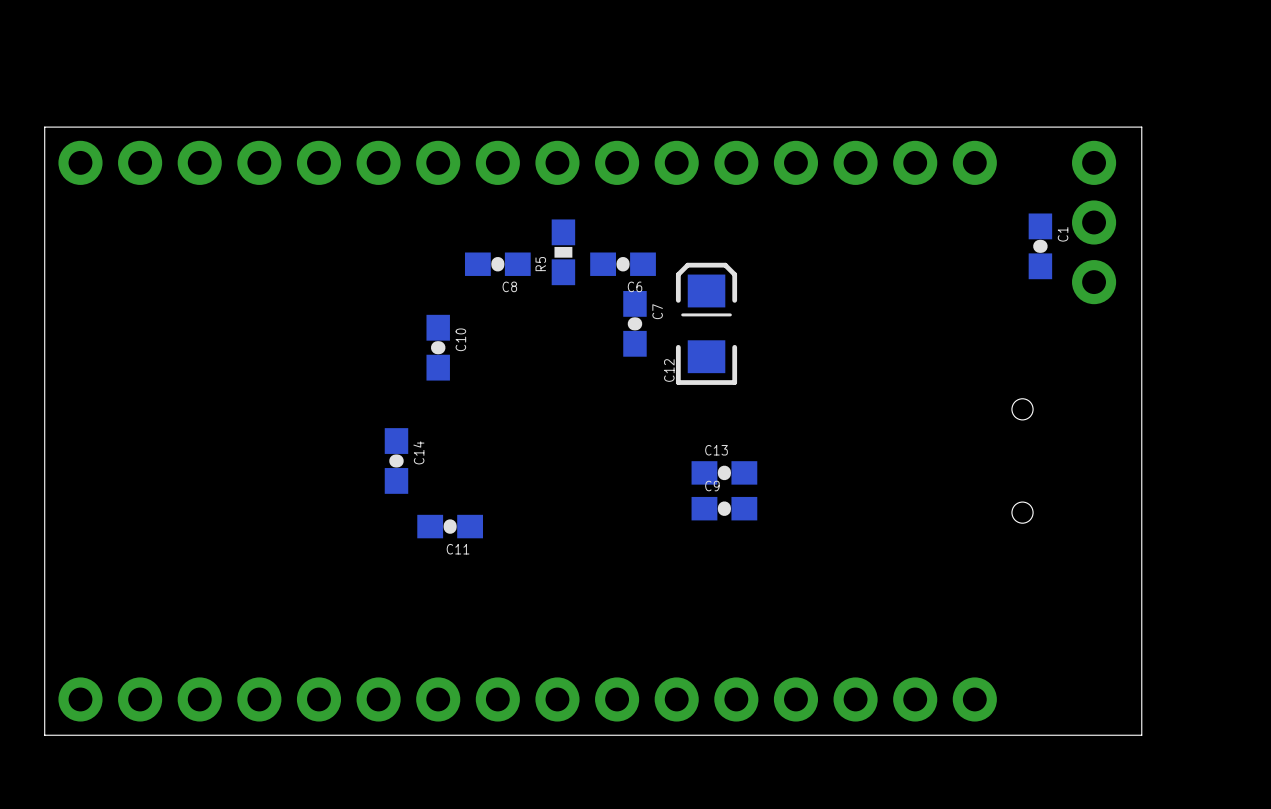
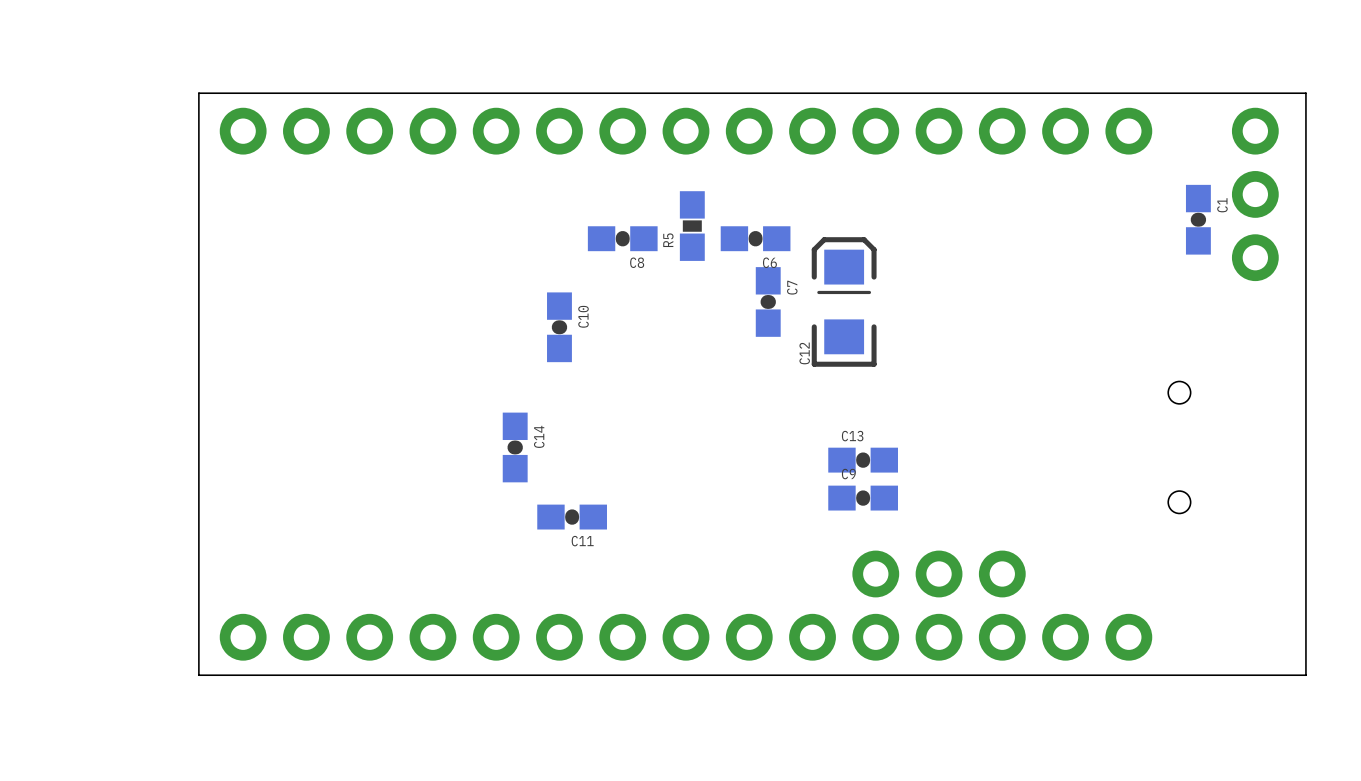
board edge: (98, 127) (44, 127) (44, 735) (1141, 735) (1141, 675) -> (198, 93) (198, 675) (1305, 675)
part: (527, 162) -> none
part: none -> (939, 573)
part: none -> (686, 637)
part: (527, 699) -> none

